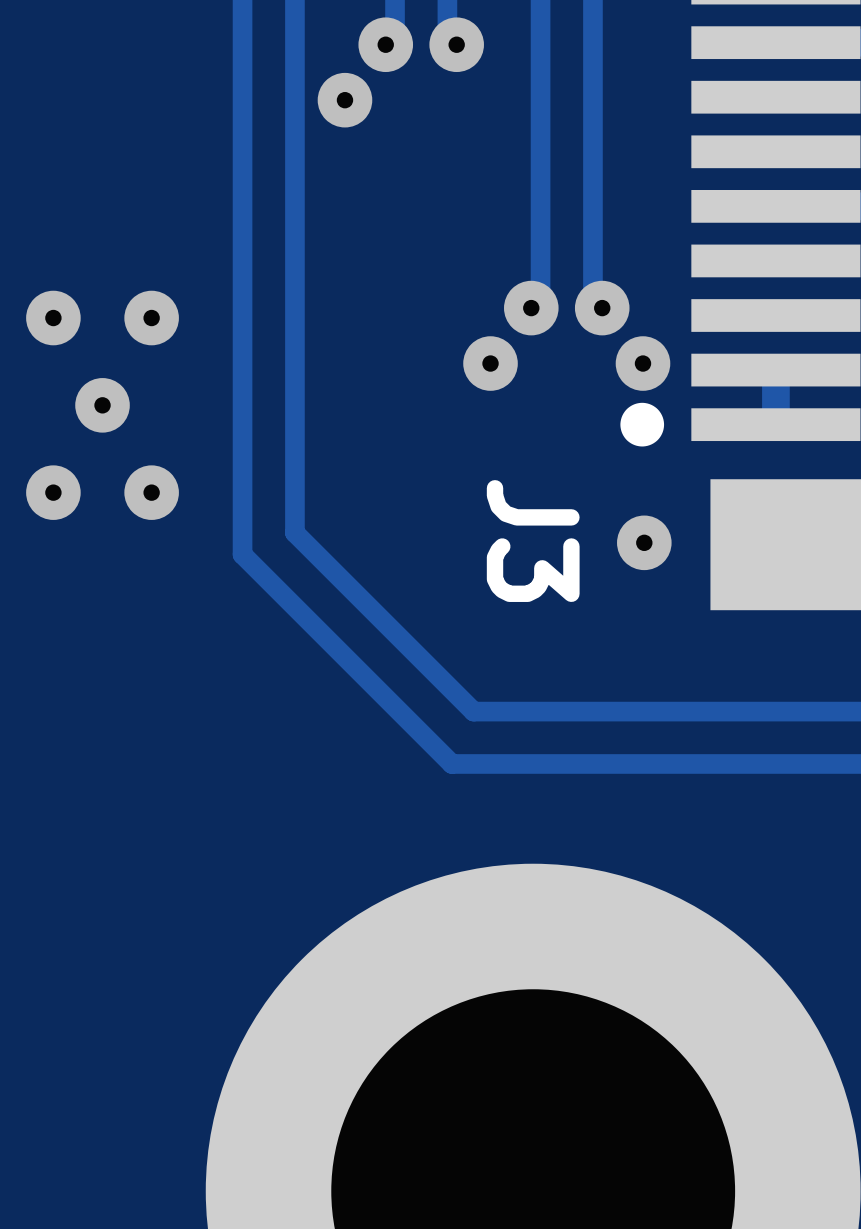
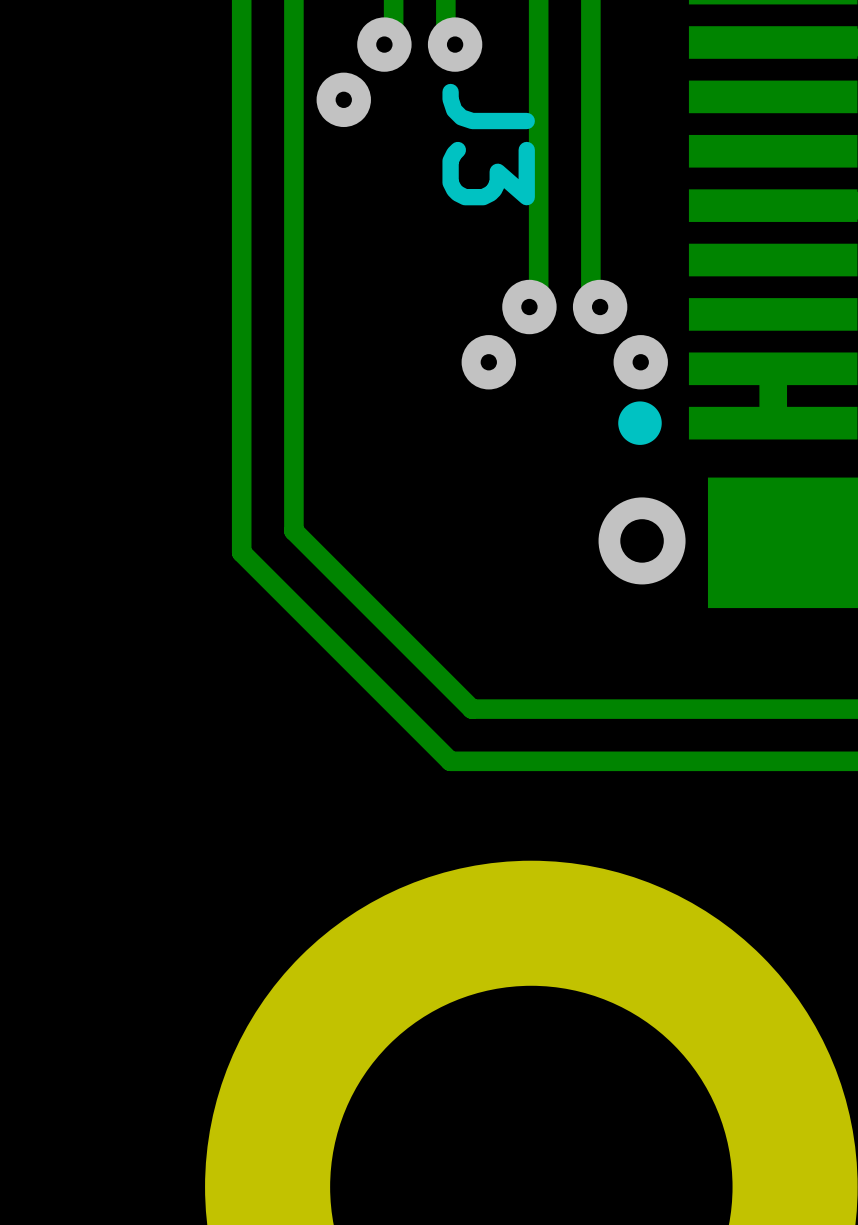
via: (53, 318) -> none
via: (151, 318) -> none
via: (102, 405) -> none
via: (53, 492) -> none
via: (151, 492) -> none
via size: [617, 515, 672, 571] -> [598, 497, 686, 585]
J3 name position: J3 (533, 541) -> J3 (488, 144)

